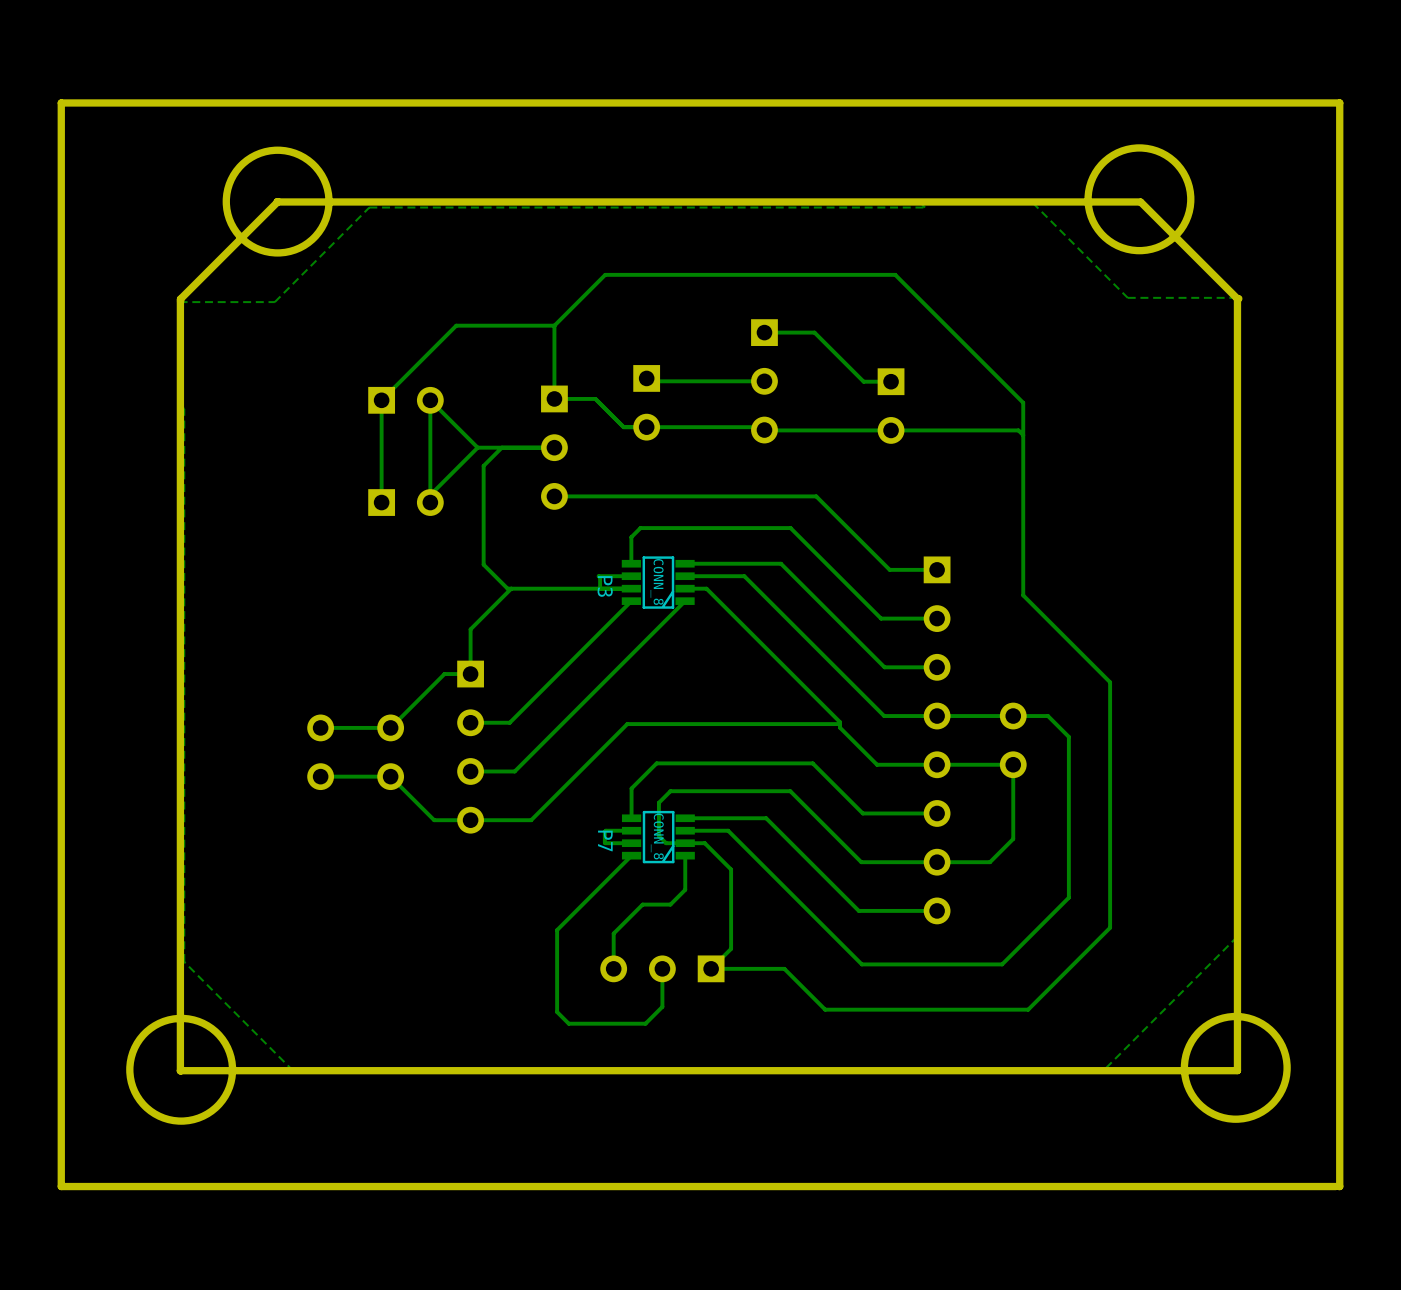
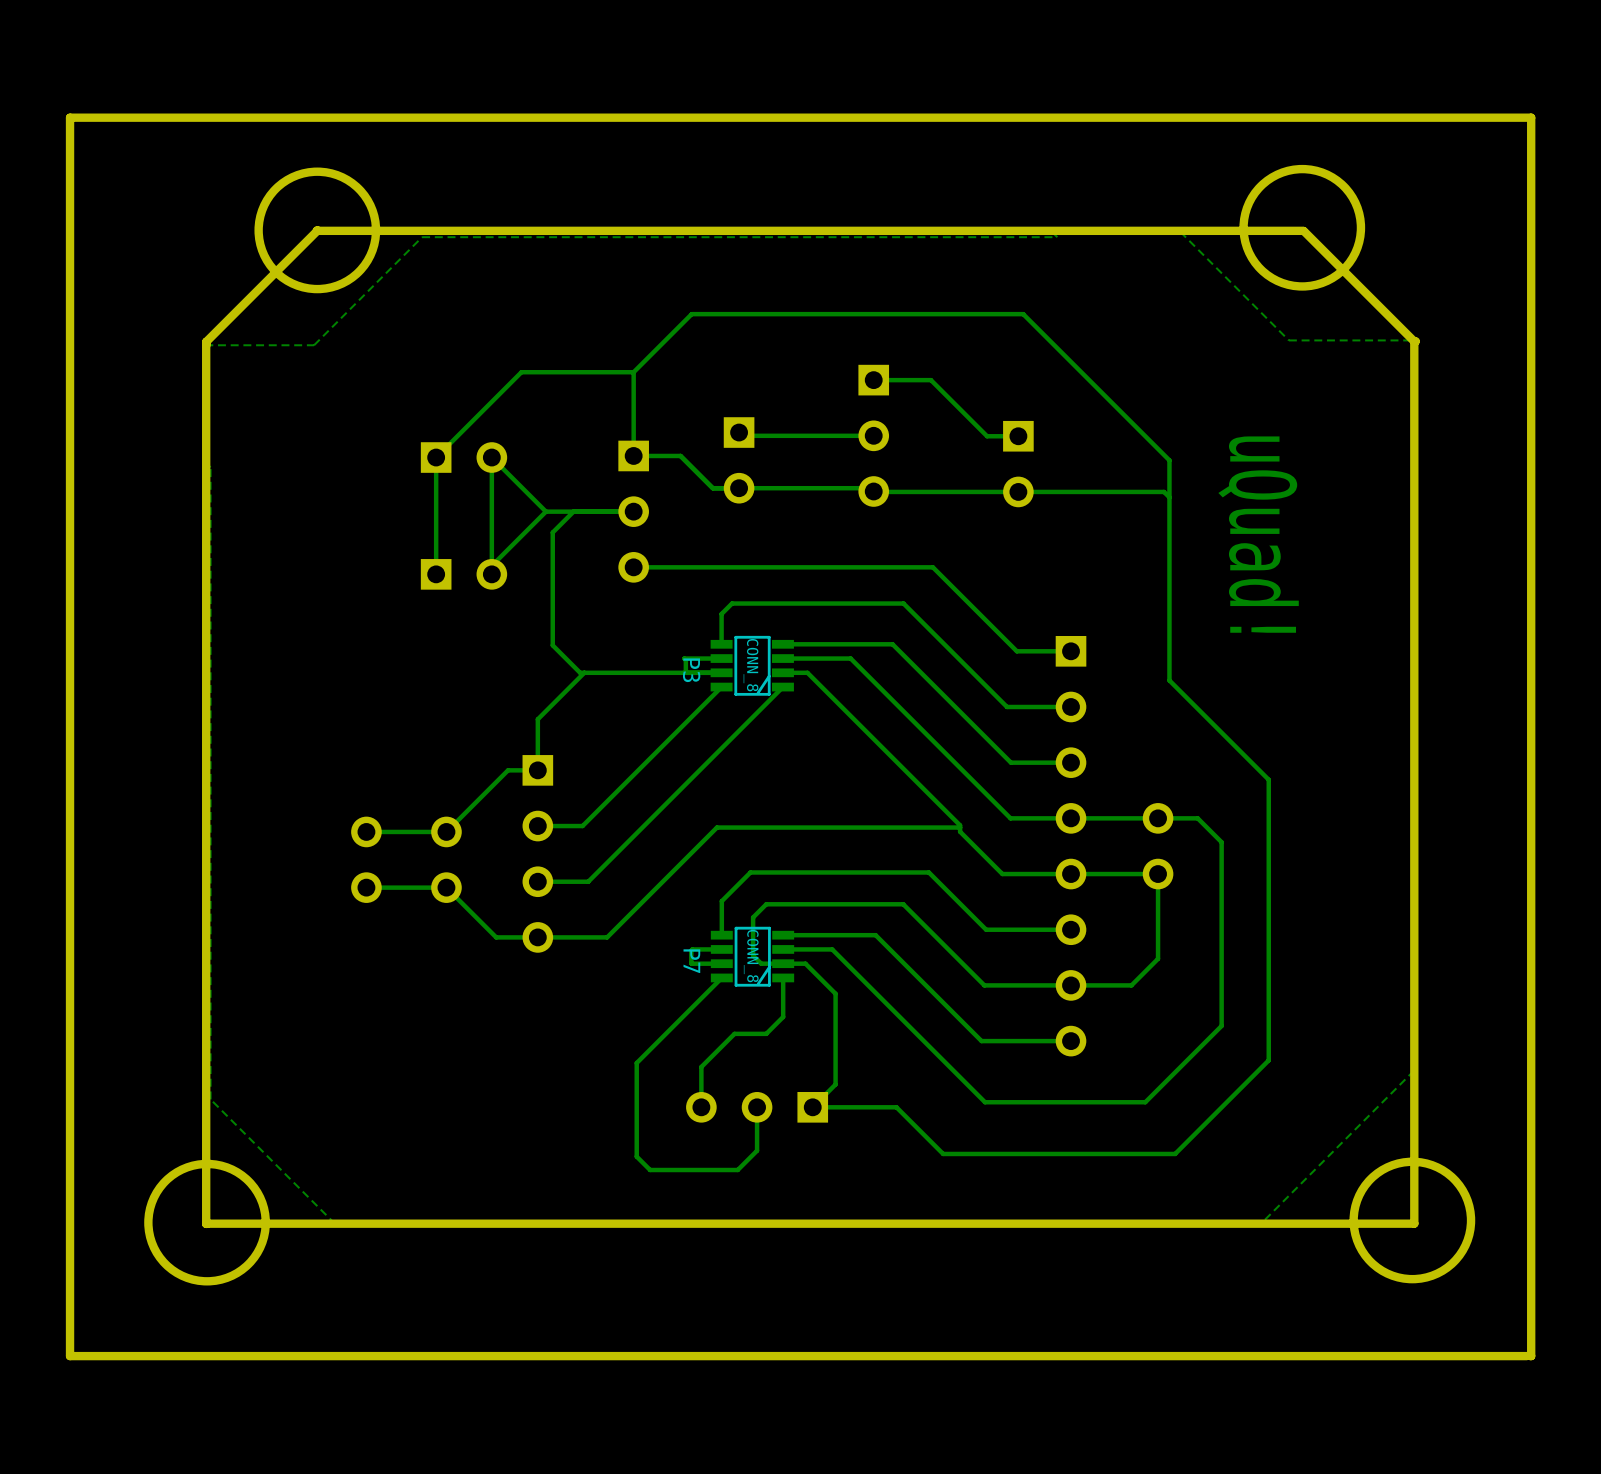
text: none -> uQuad! (1258, 534)

